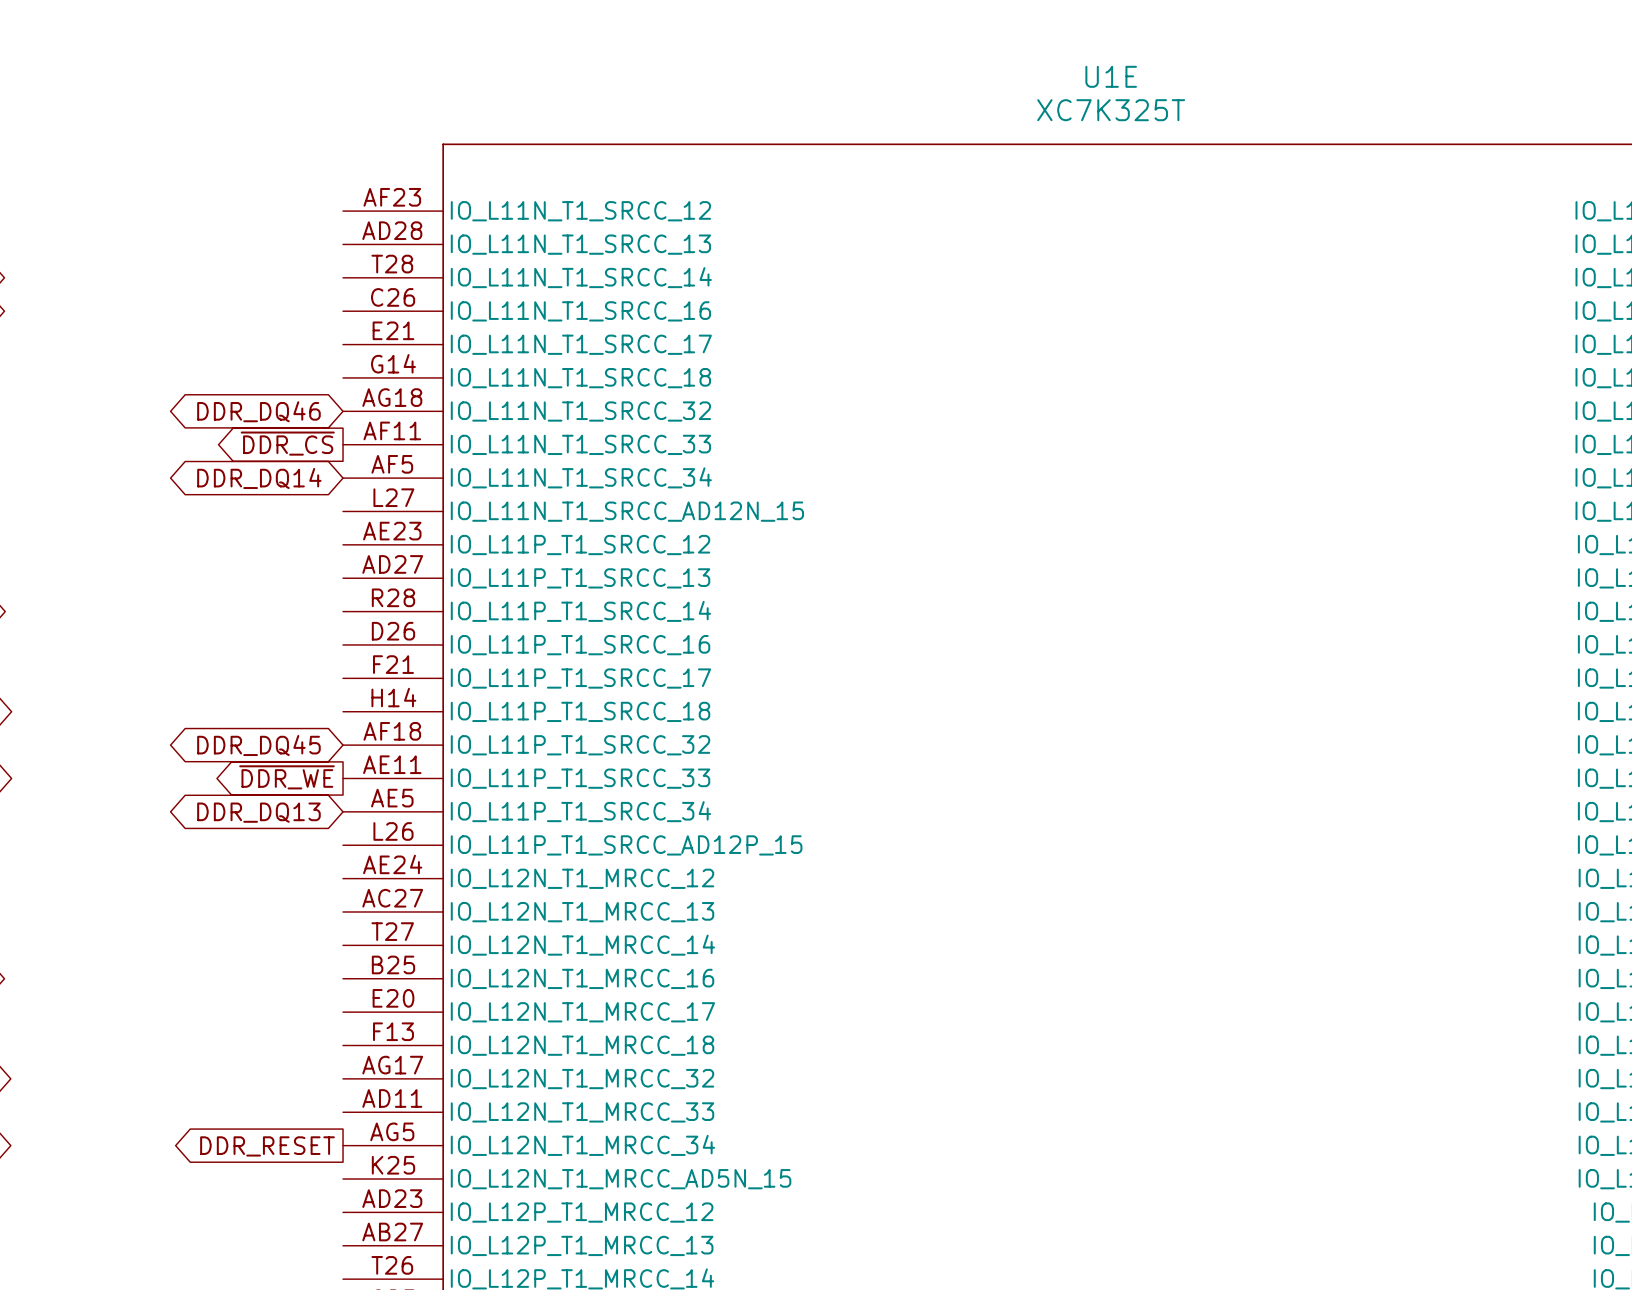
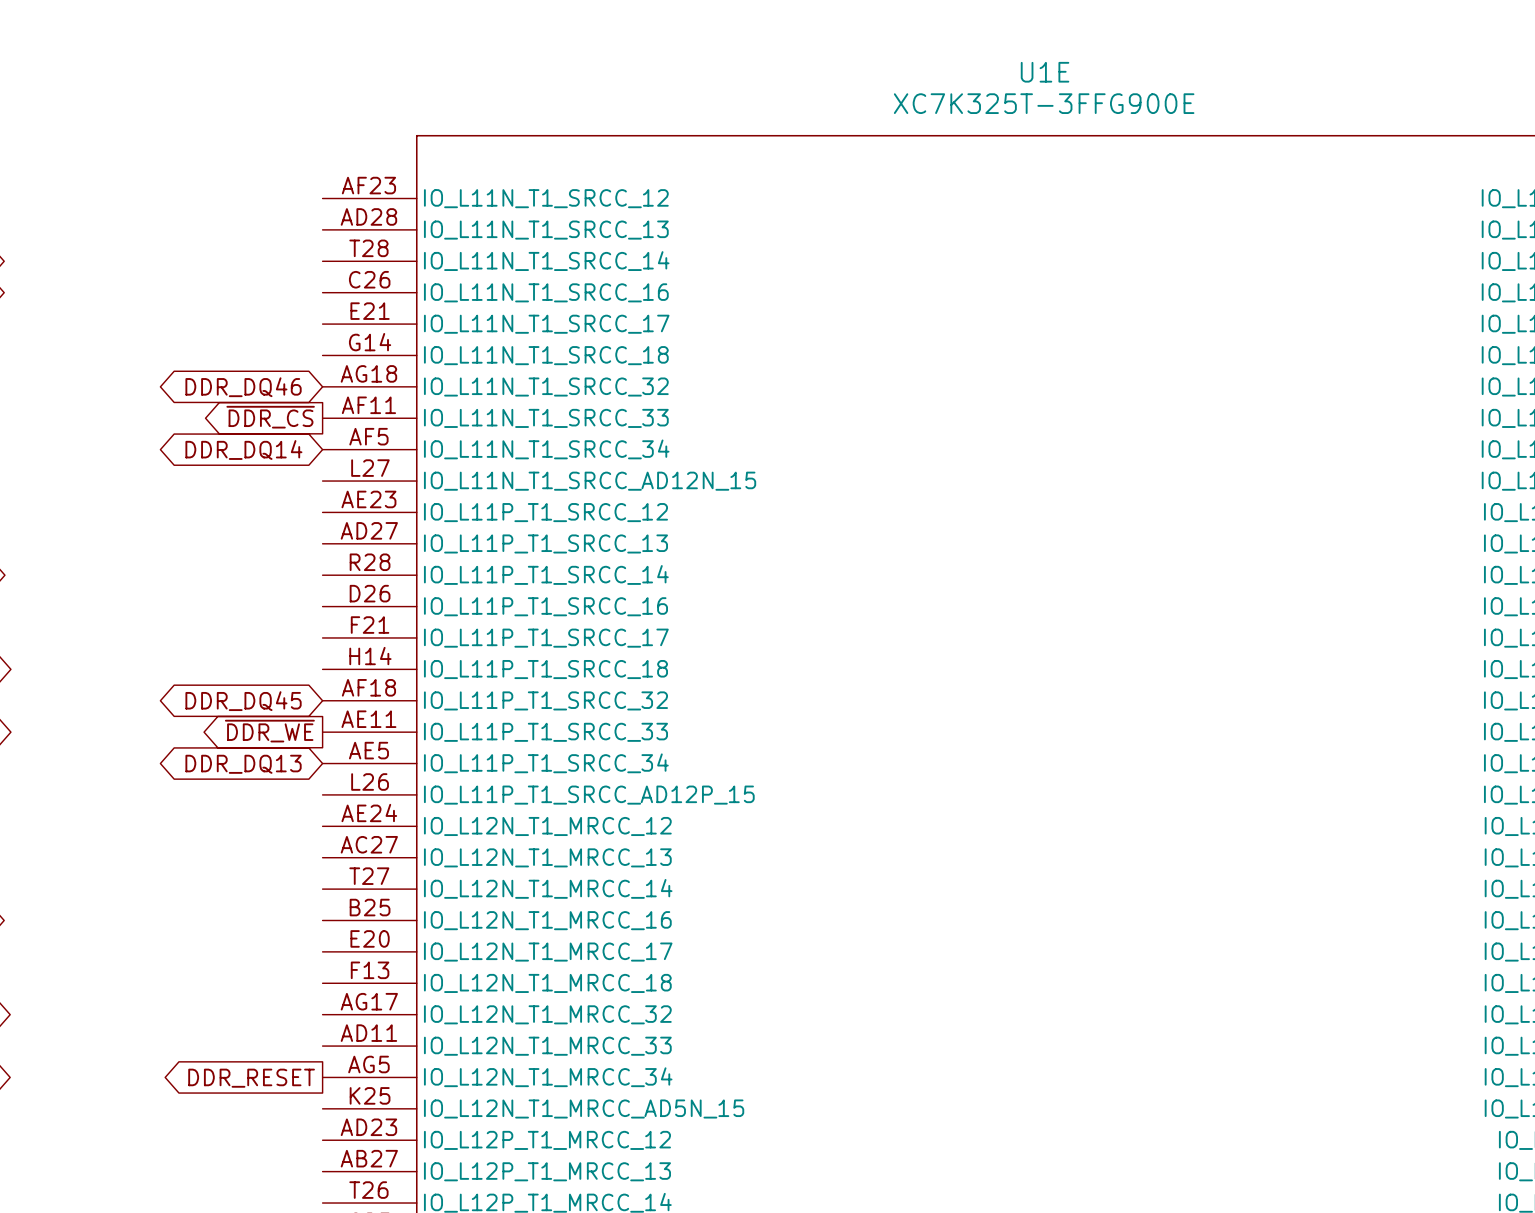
U1E value: XC7K325T (1111, 110) -> XC7K325T-3FFG900E (1044, 103)

